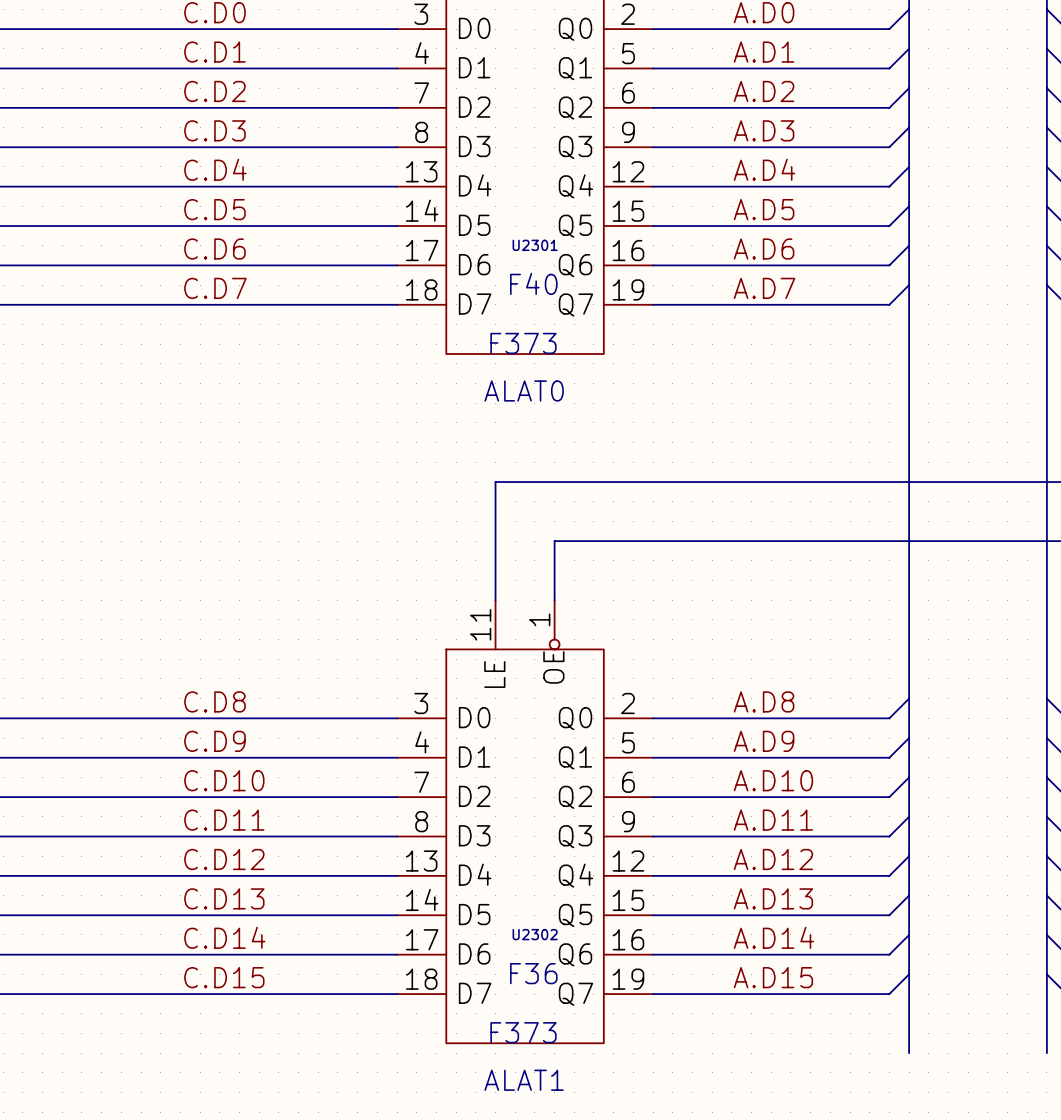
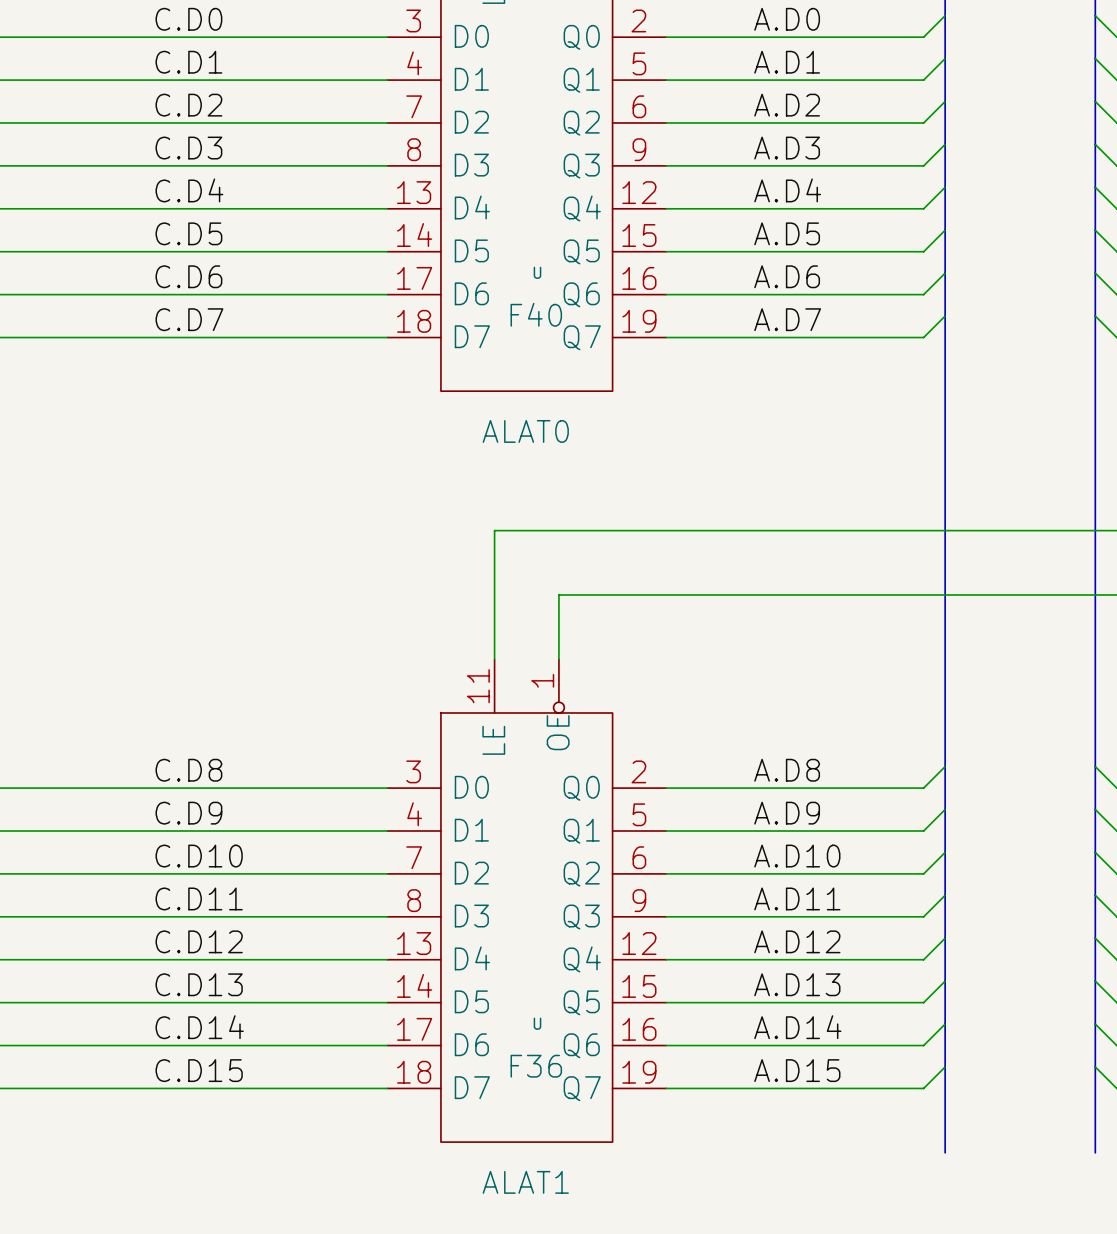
U2301 name: U2301 (535, 245) -> U (537, 272)
U2301 value: F373 (523, 343) -> none
U2302 name: U2302 (535, 934) -> U (537, 1023)
U2302 value: F373 (523, 1032) -> none

